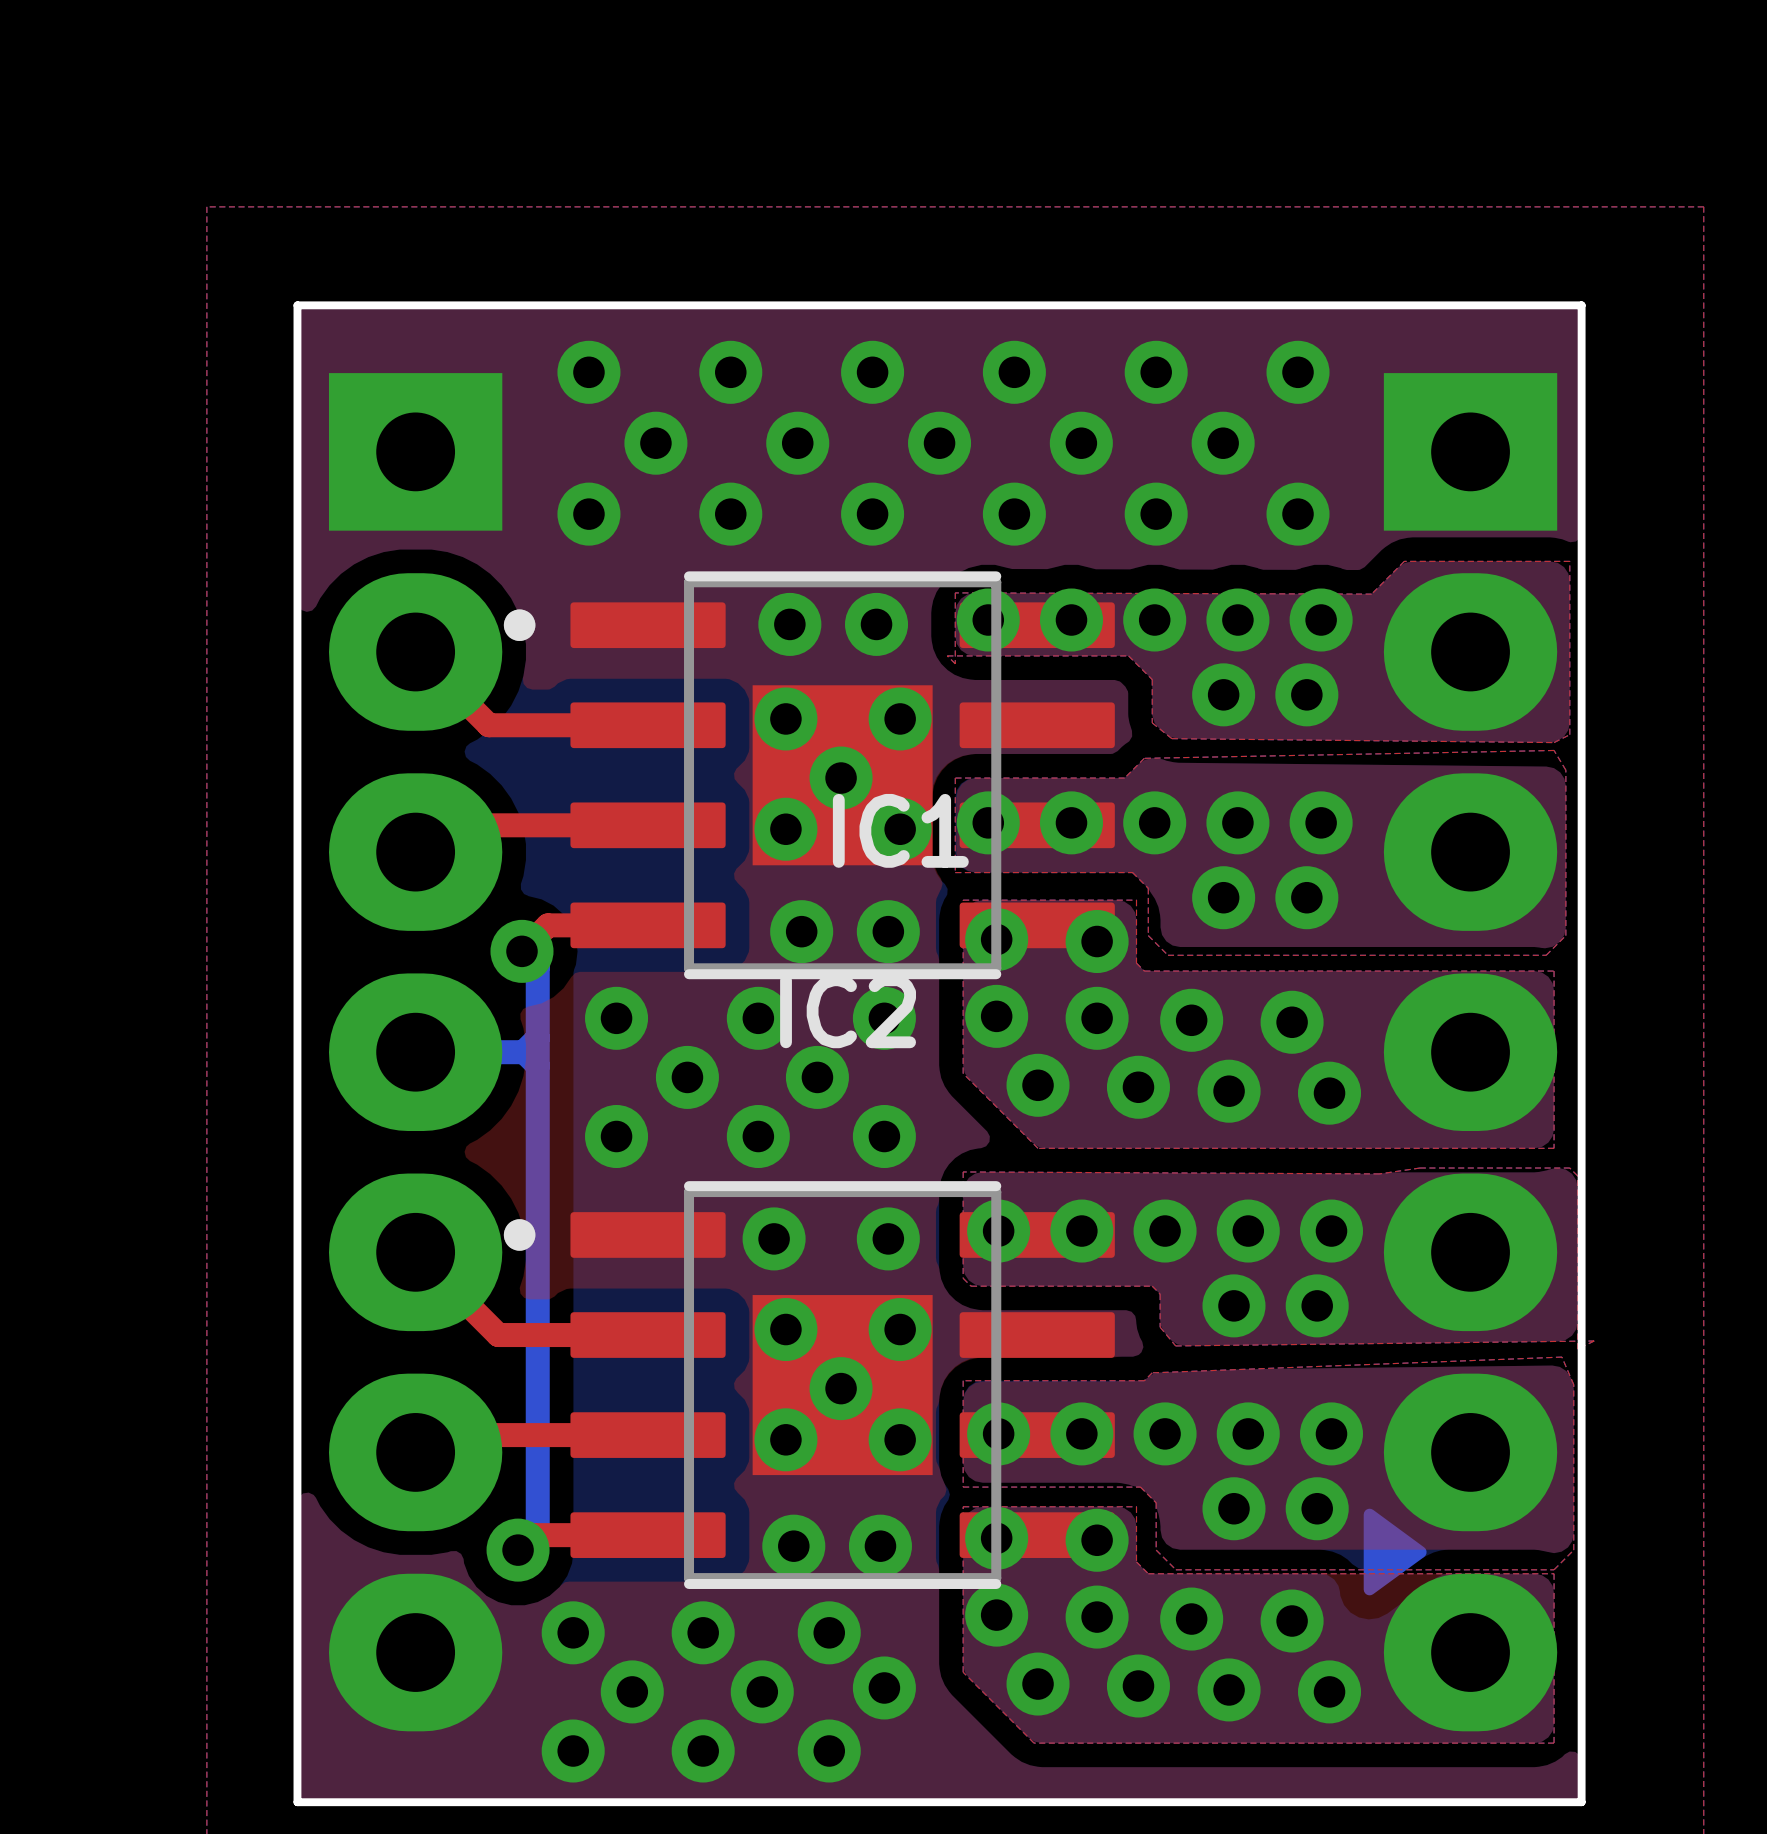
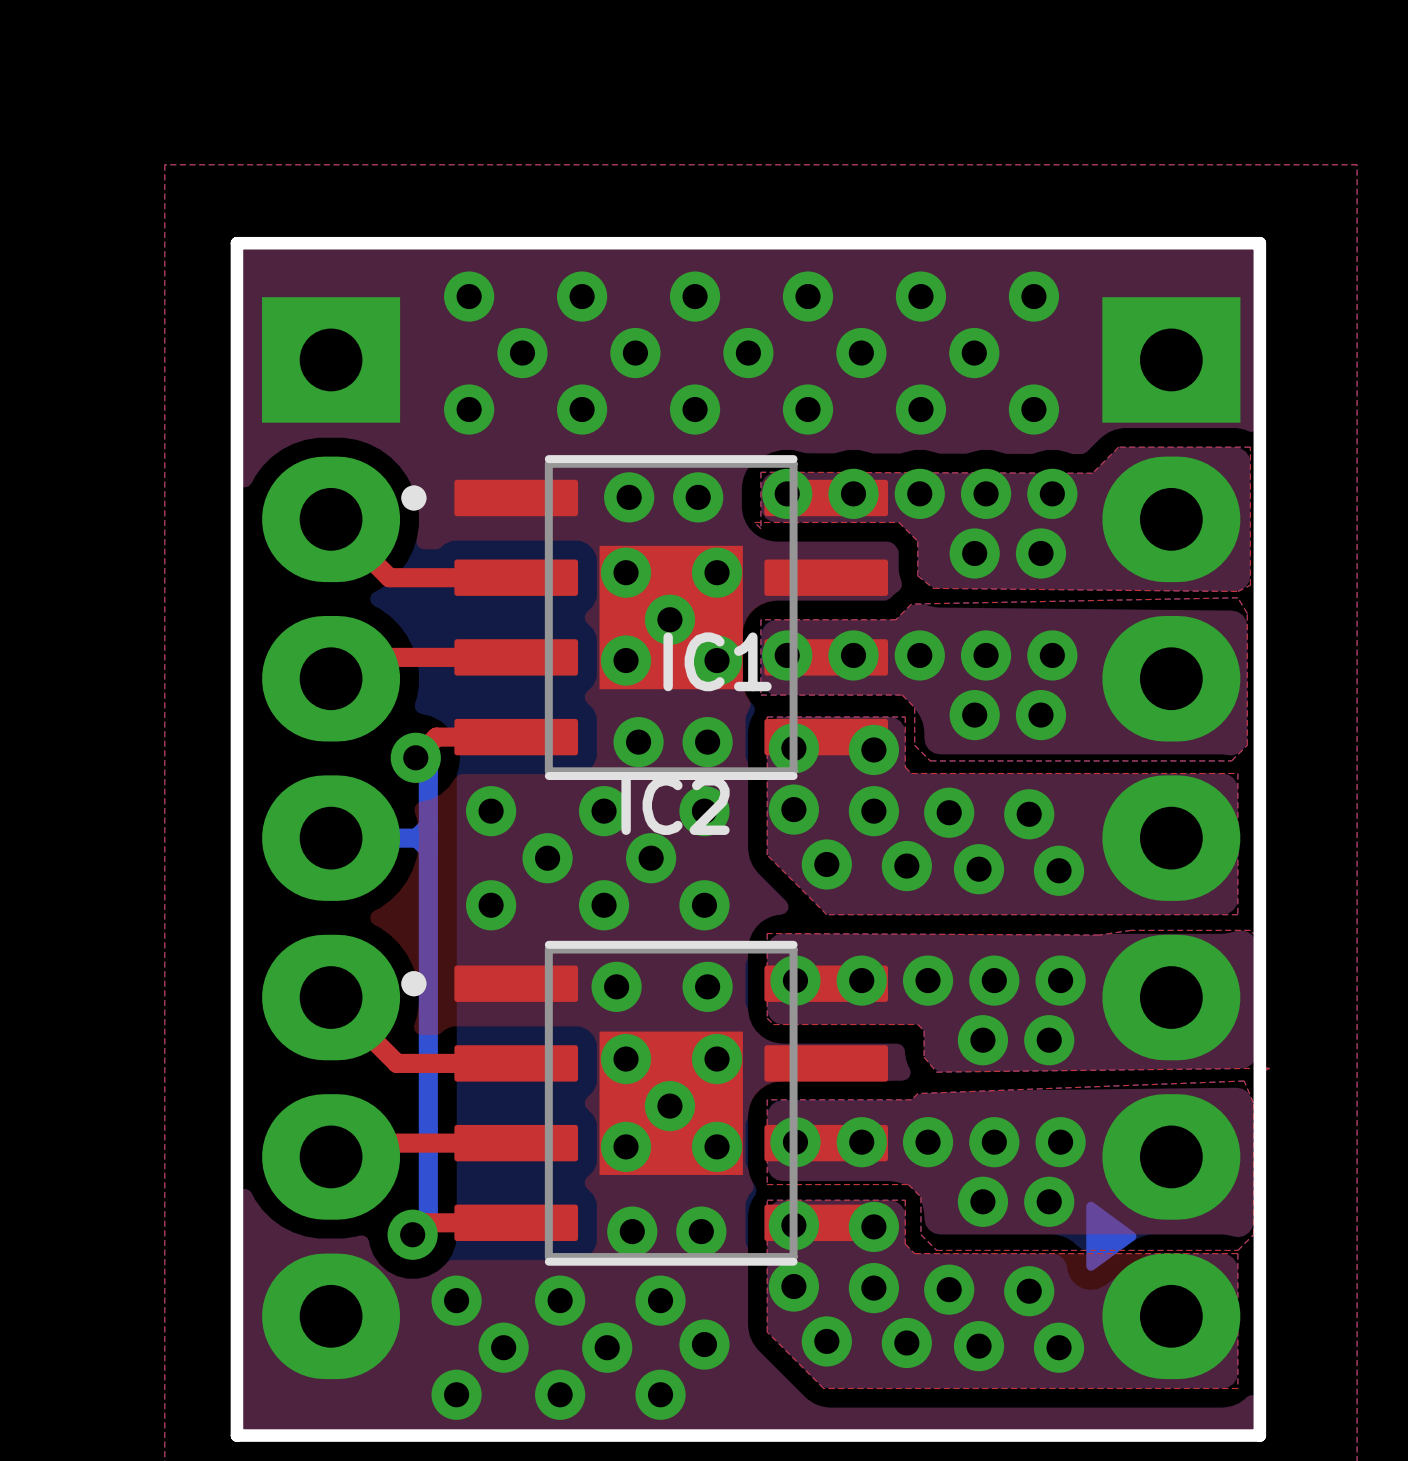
board edge width: thin (297, 305) (1581, 305) (1581, 1802) (297, 1802) (297, 305) -> thick (236, 243) (1259, 243) (1259, 1435) (236, 1435) (236, 243)

